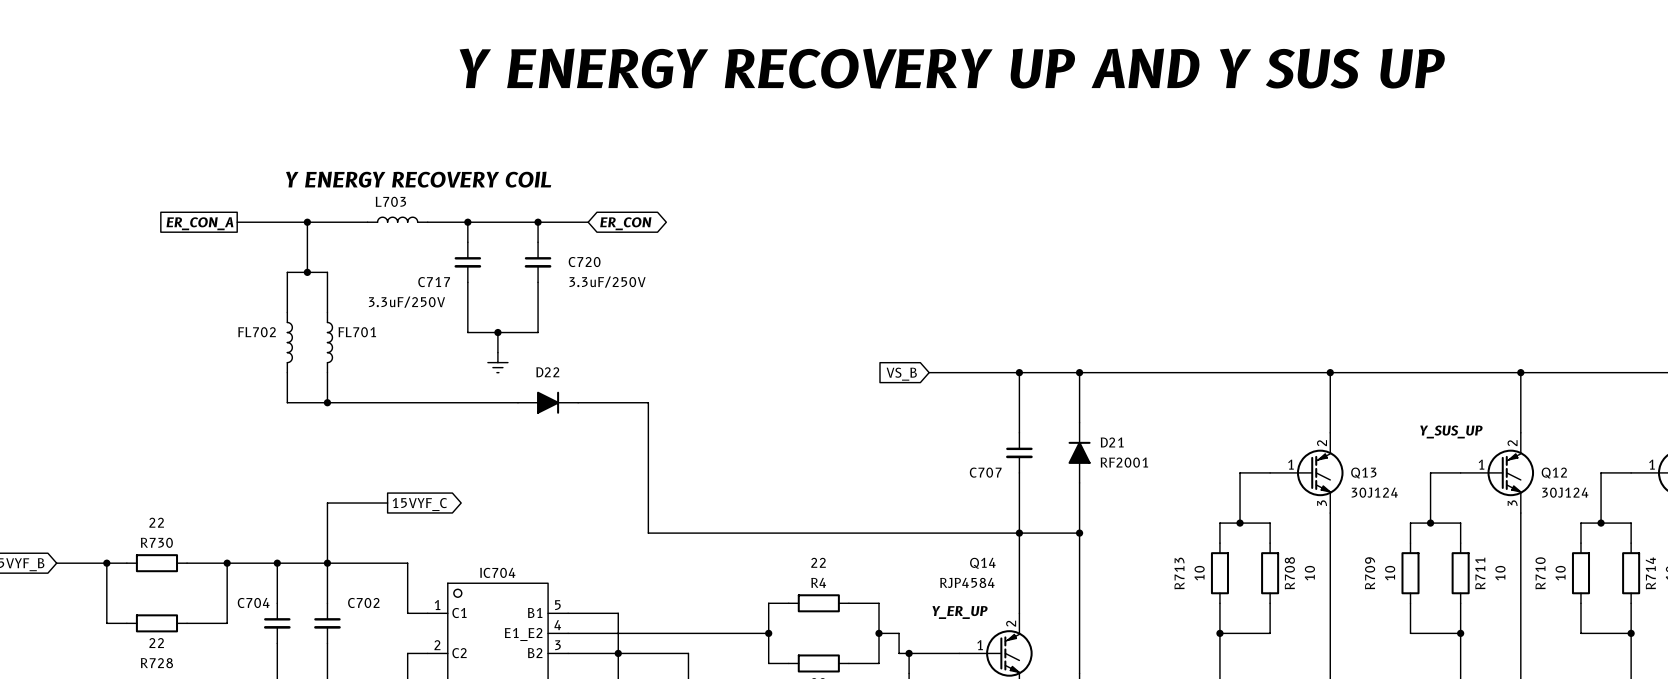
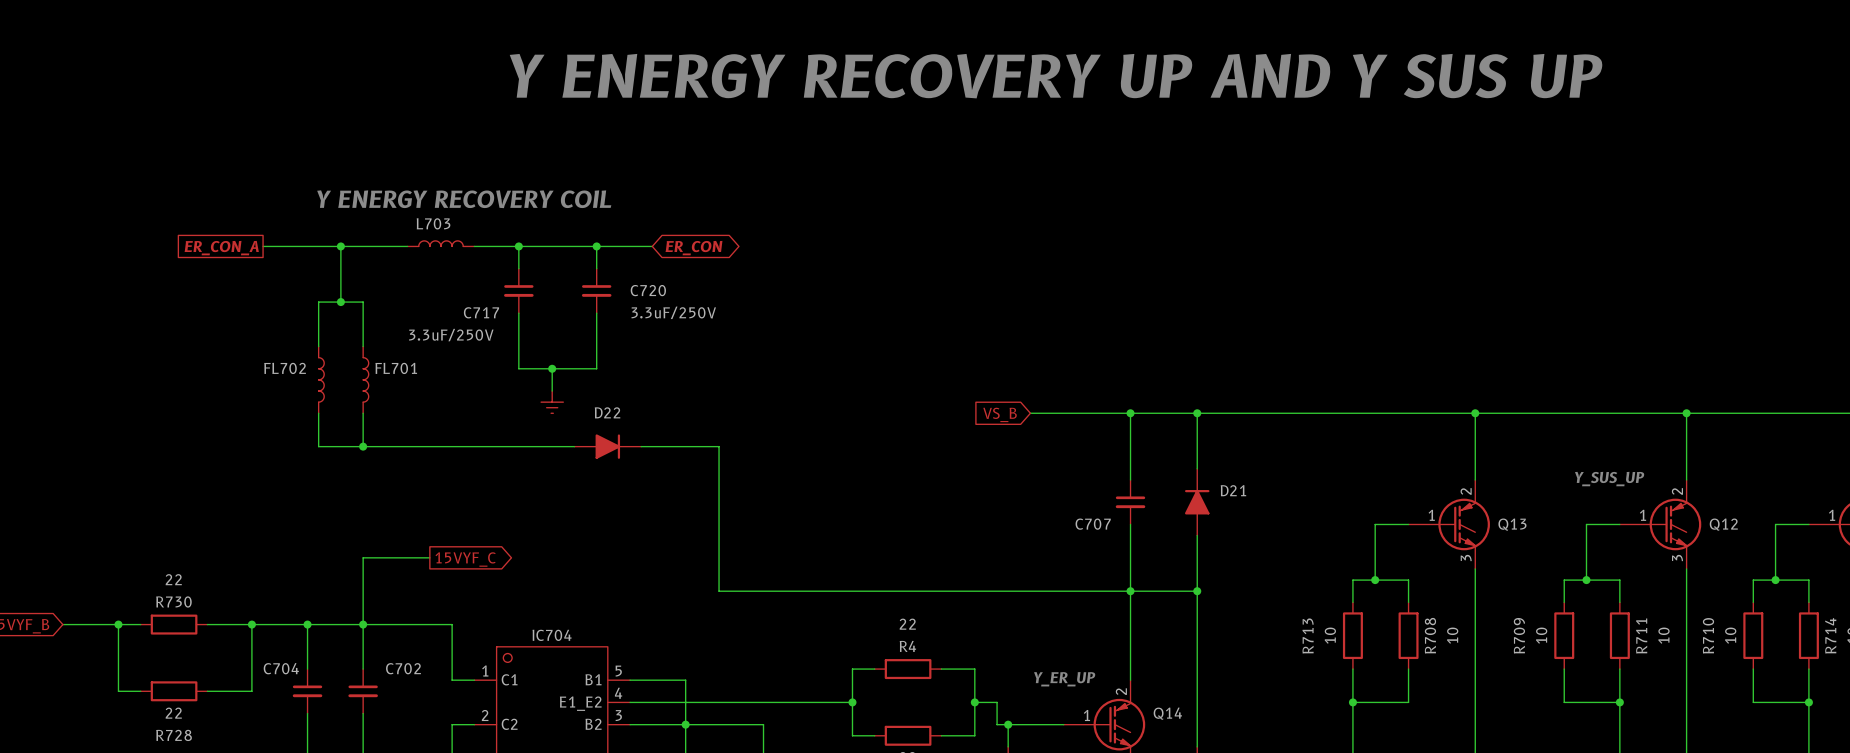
D21 value: RF2001 (1124, 462) -> none
Q13 value: 30J124 (1374, 492) -> none
Q12 value: 30J124 (1565, 492) -> none
Q14 name position: Q14 (982, 563) -> Q14 (1167, 713)
Q14 value: RJP4584 (967, 582) -> none

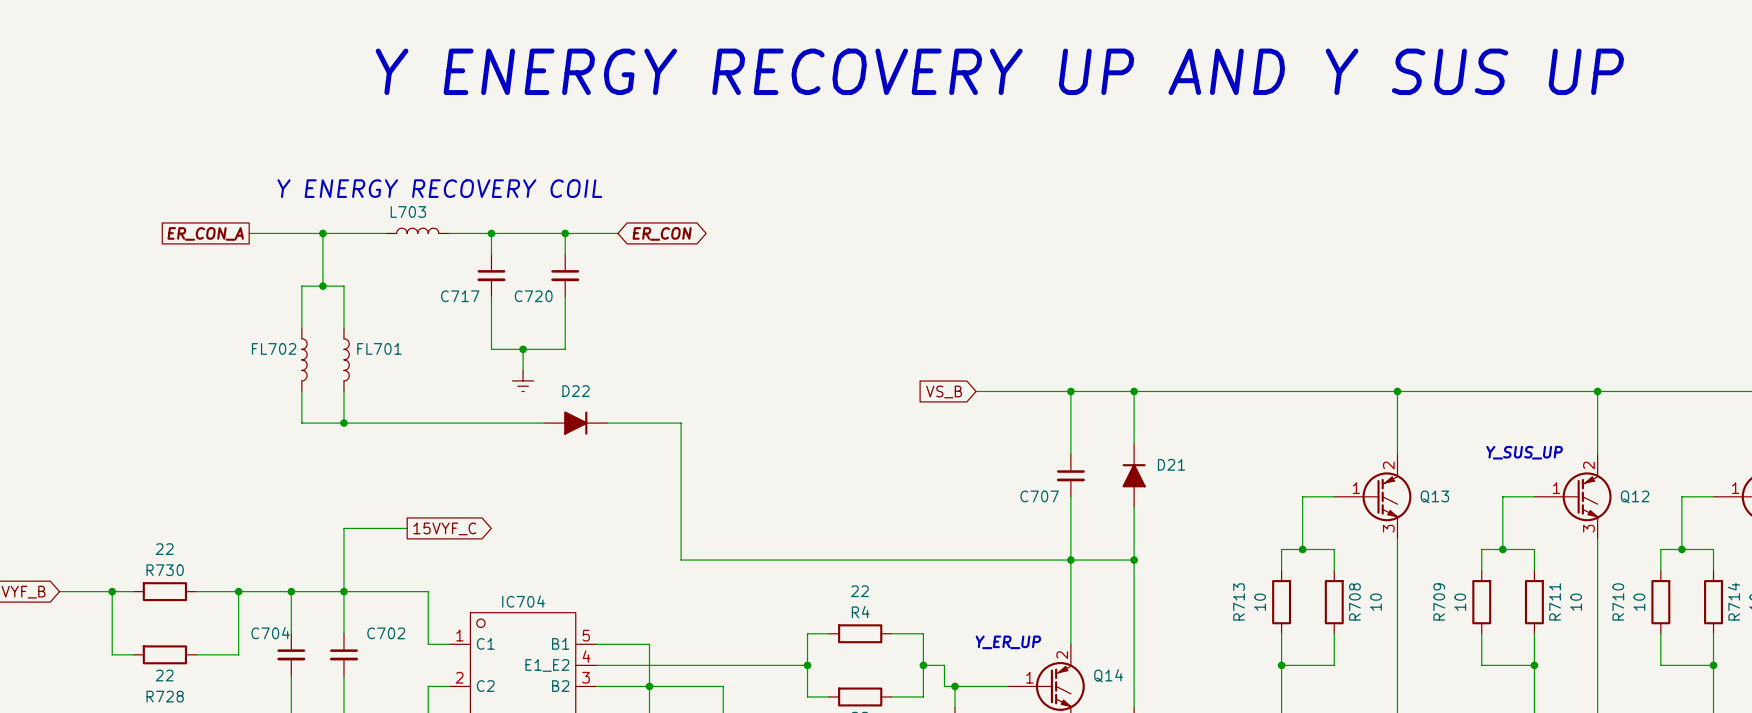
C720 name position: C720 (648, 290) -> C720 (533, 296)
C720 value: 3.3uF/250V (673, 312) -> none
C717 value: 3.3uF/250V (451, 335) -> none

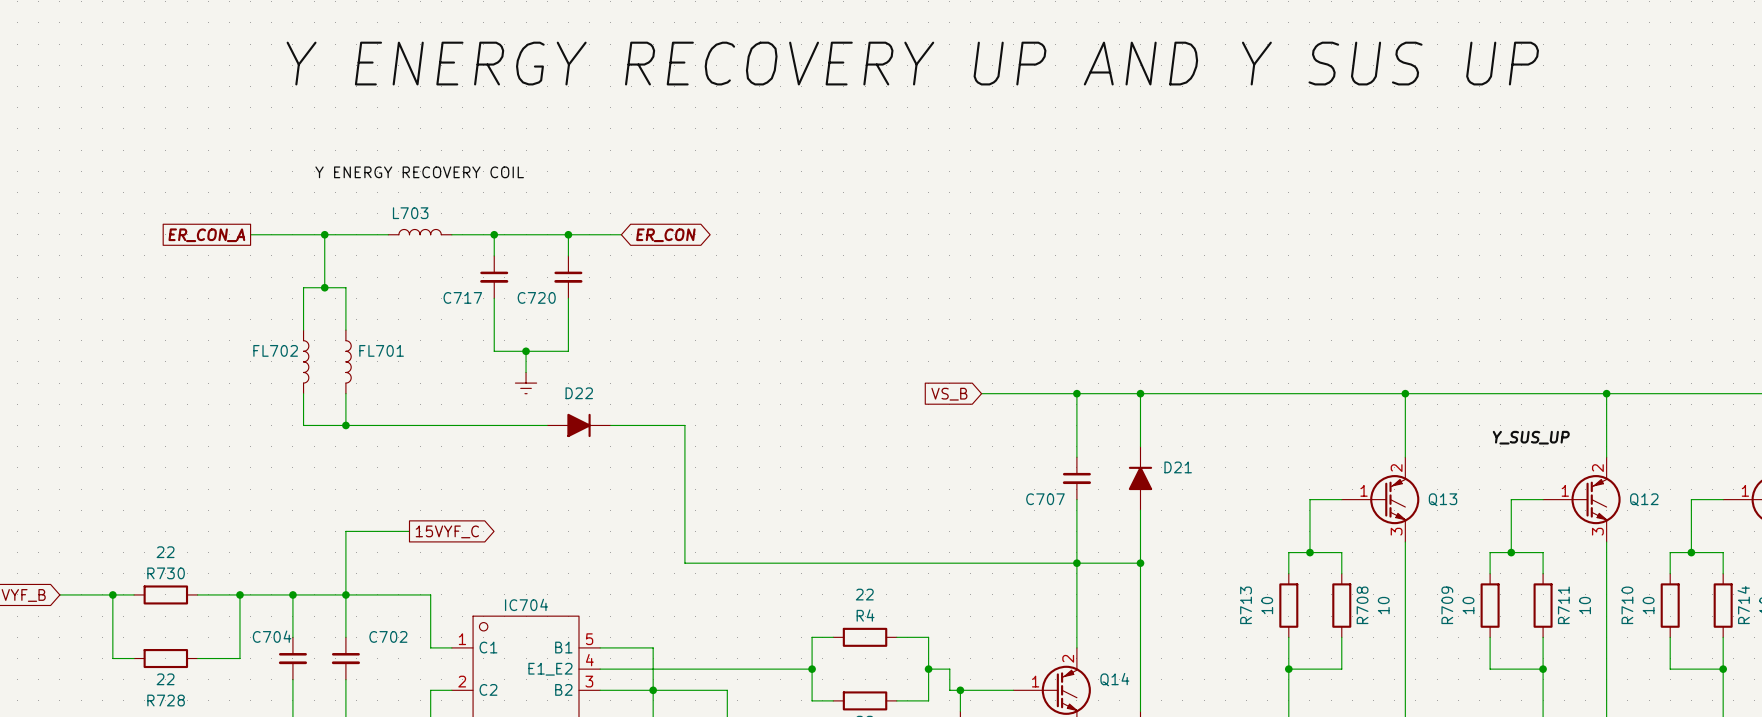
label: none -> Y ENERGY RECOVERY UP AND Y SUS UP (912, 63)
text: Y ENERGY RECOVERY UP AND Y SUS UP (999, 71) -> none
label: none -> Y ENERGY RECOVERY COIL (419, 172)
text: Y ENERGY RECOVERY COIL (439, 188) -> none
label: none -> Y_SUS_UP (1531, 437)
text: Y_SUS_UP (1524, 452) -> none
text: Y_ER_UP (1008, 642) -> none

